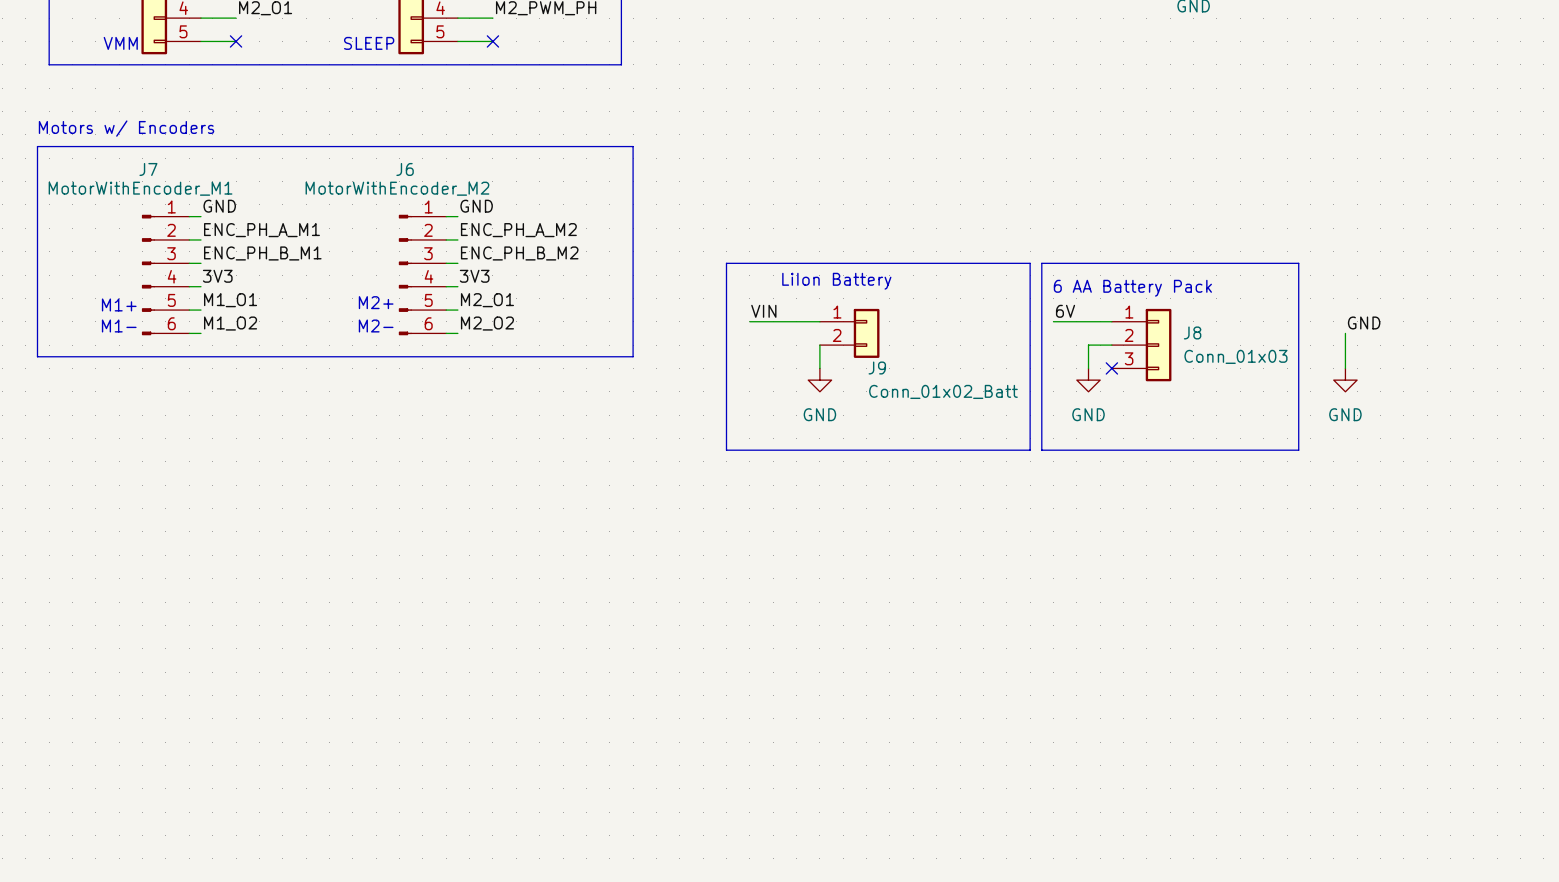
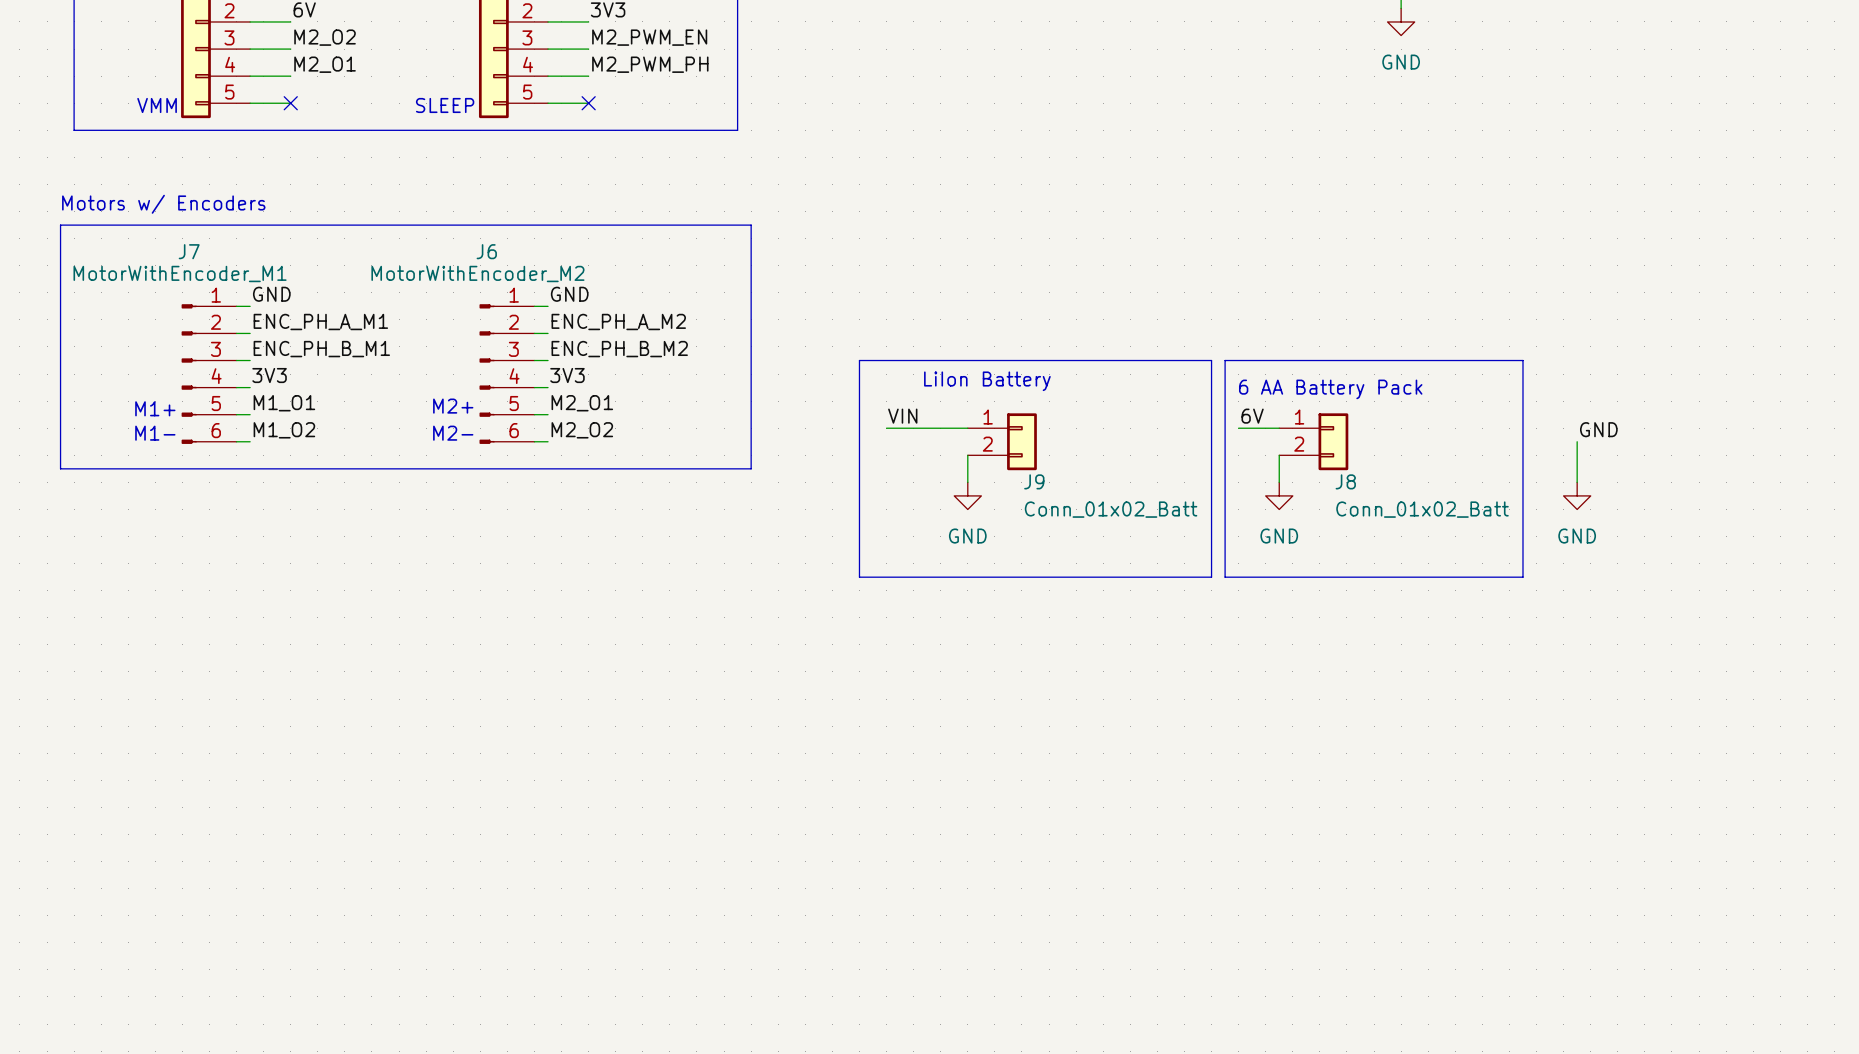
J8 symbol: [1111, 308, 1172, 382] -> [1279, 413, 1349, 471]
J8 name position: J8 (1192, 332) -> J8 (1345, 481)
J8 value: Conn_01x03 (1235, 356) -> Conn_01x02_Batt (1422, 509)
no-connect mark: (1111, 368) -> none

